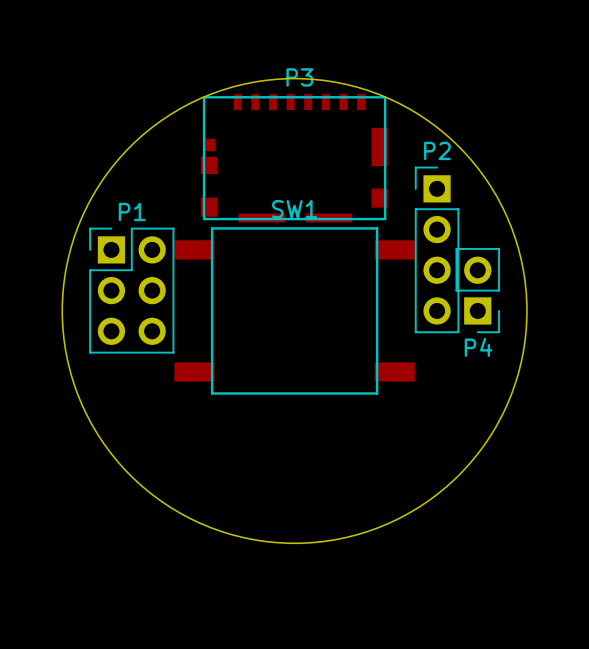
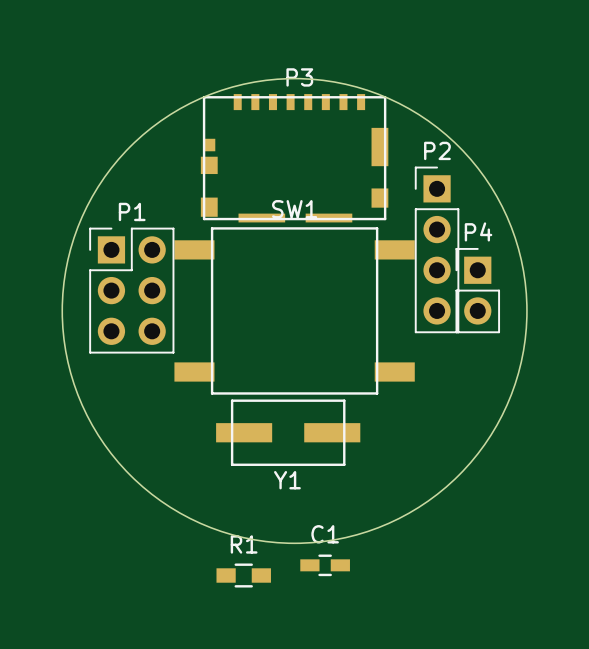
P4 rotation: 0° (477, 290) -> 180° (477, 290)
Y1: none -> (288, 432)
C1: none -> (325, 565)
R1: none -> (243, 575)

